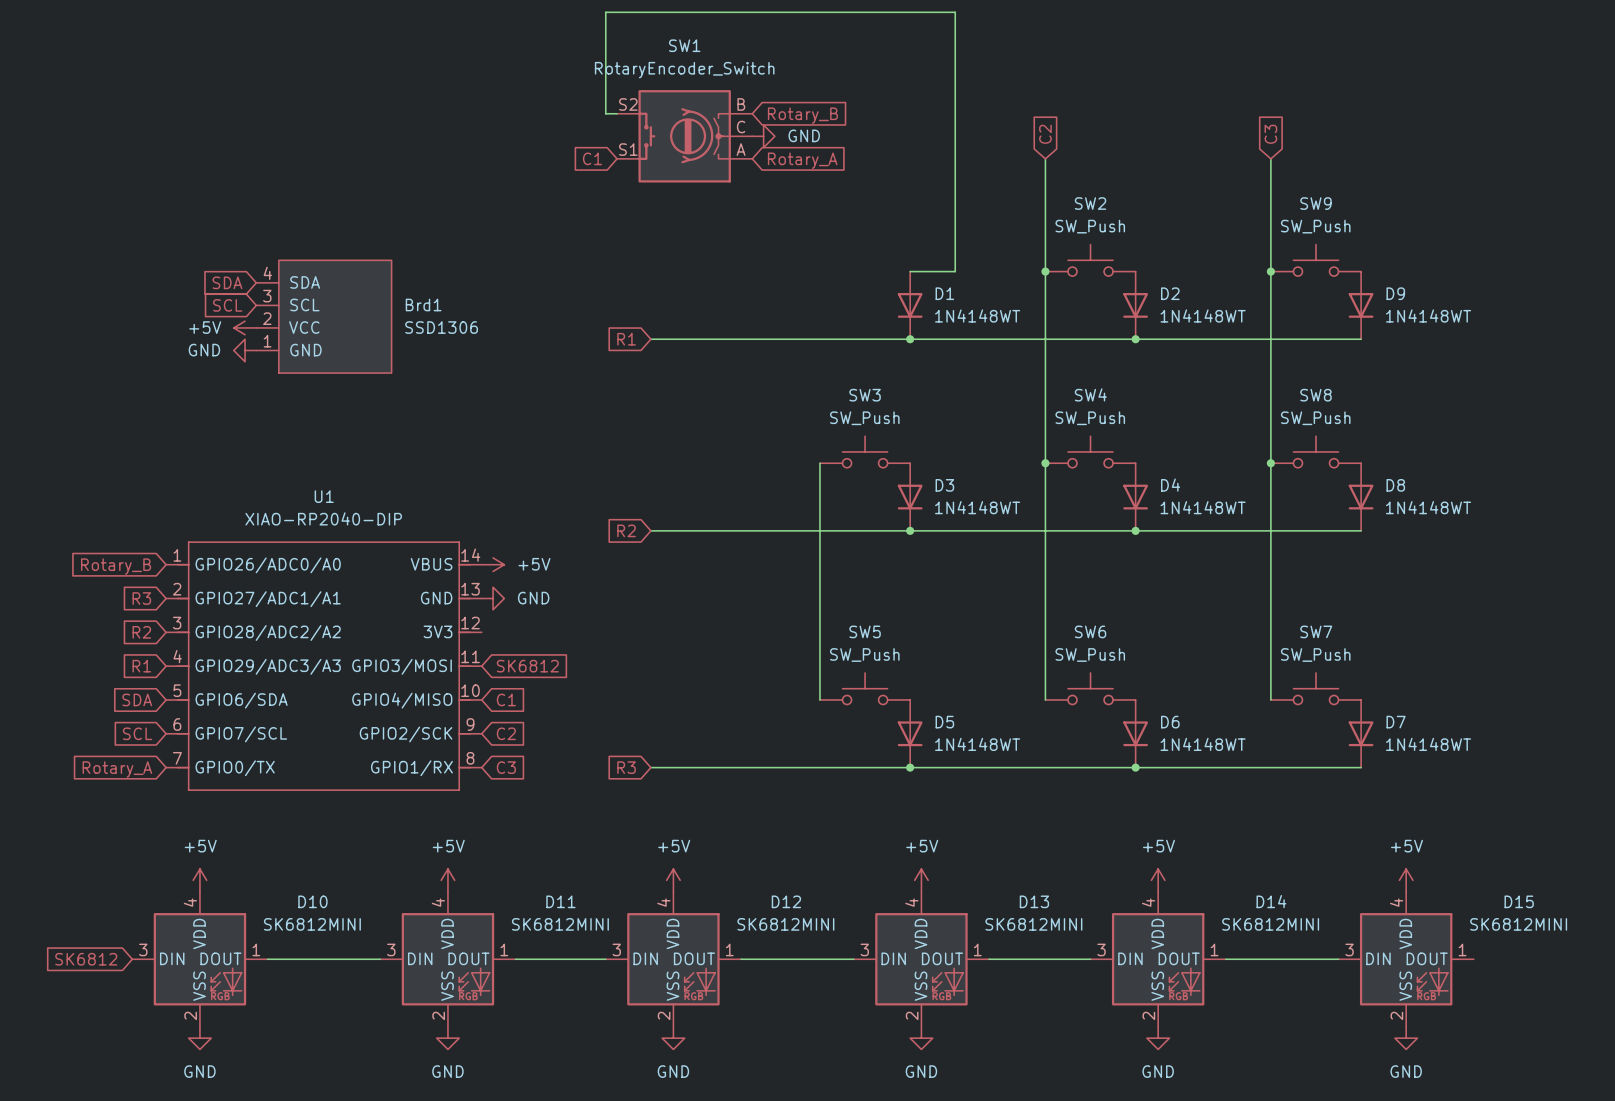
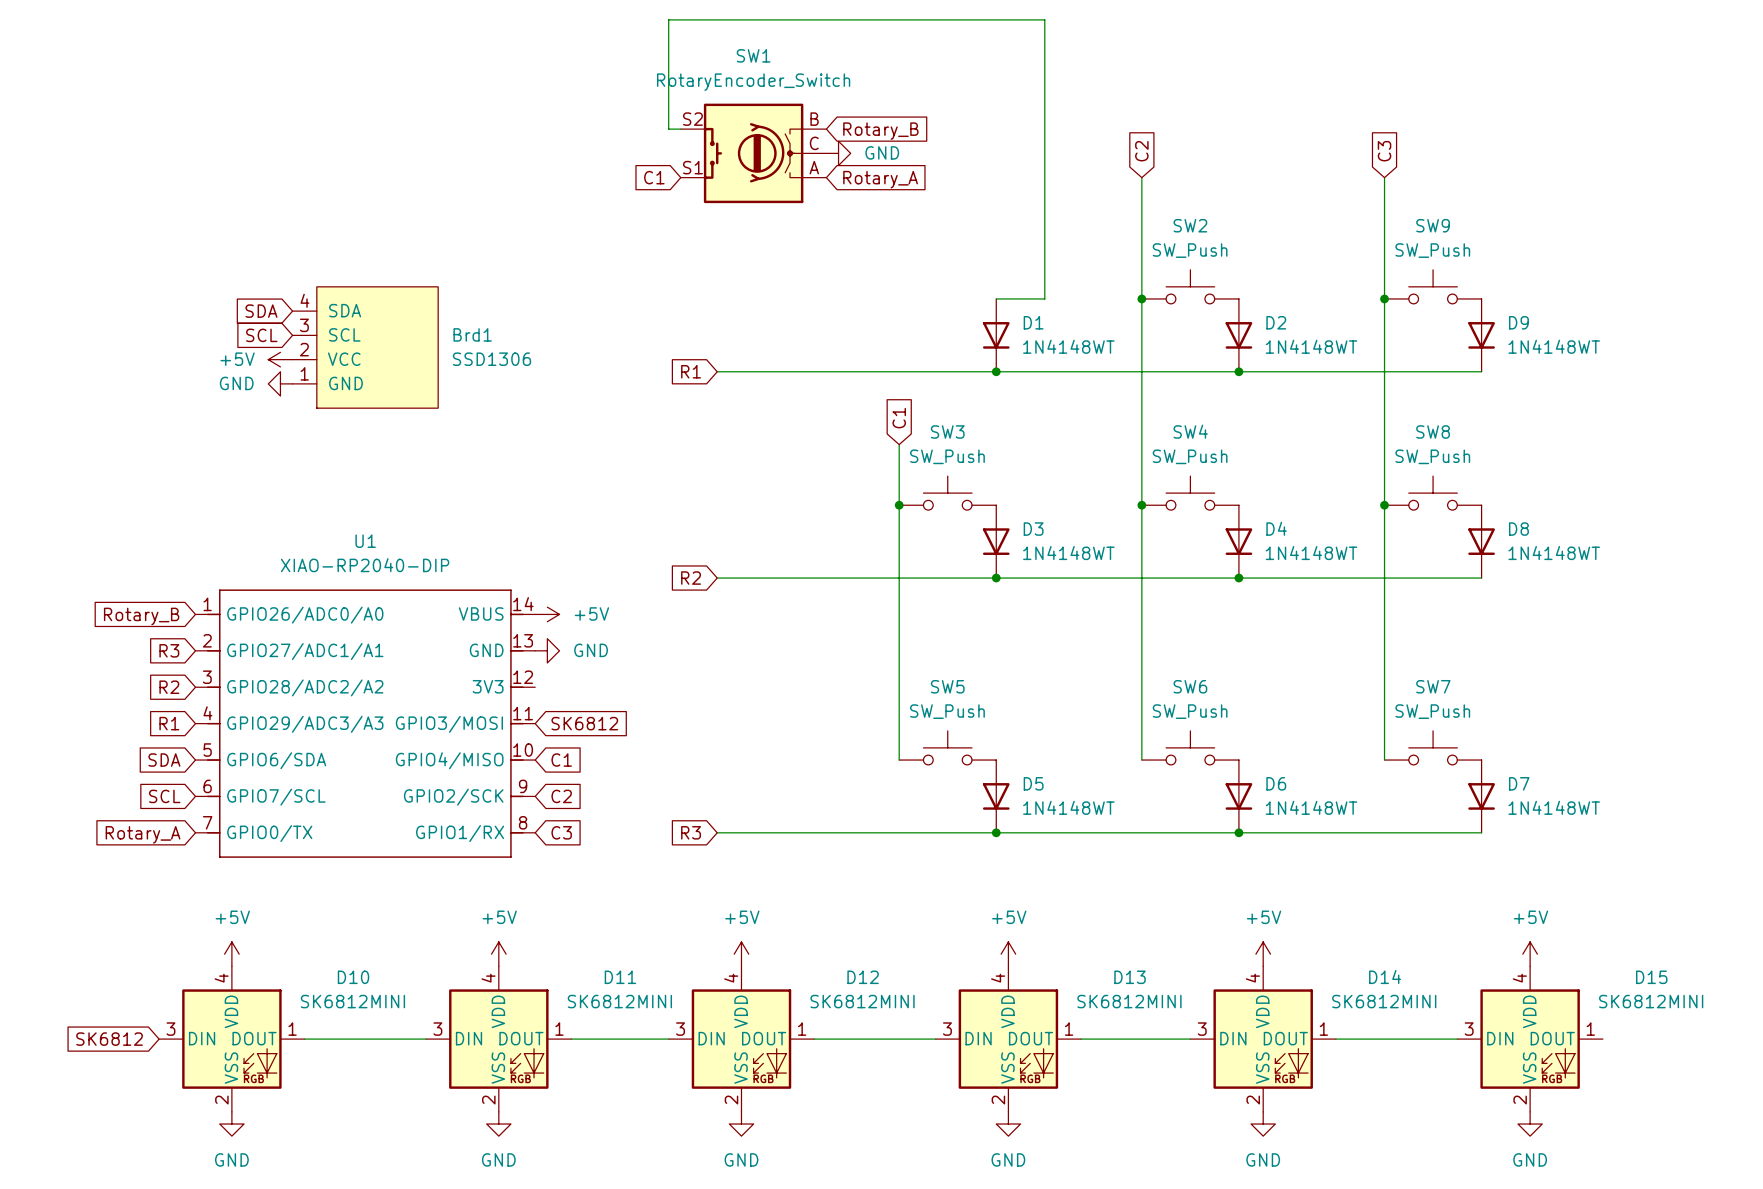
global label: none -> C1 (899, 418)
wire: none -> (899, 444) (899, 505)
junction: none -> (899, 505)

